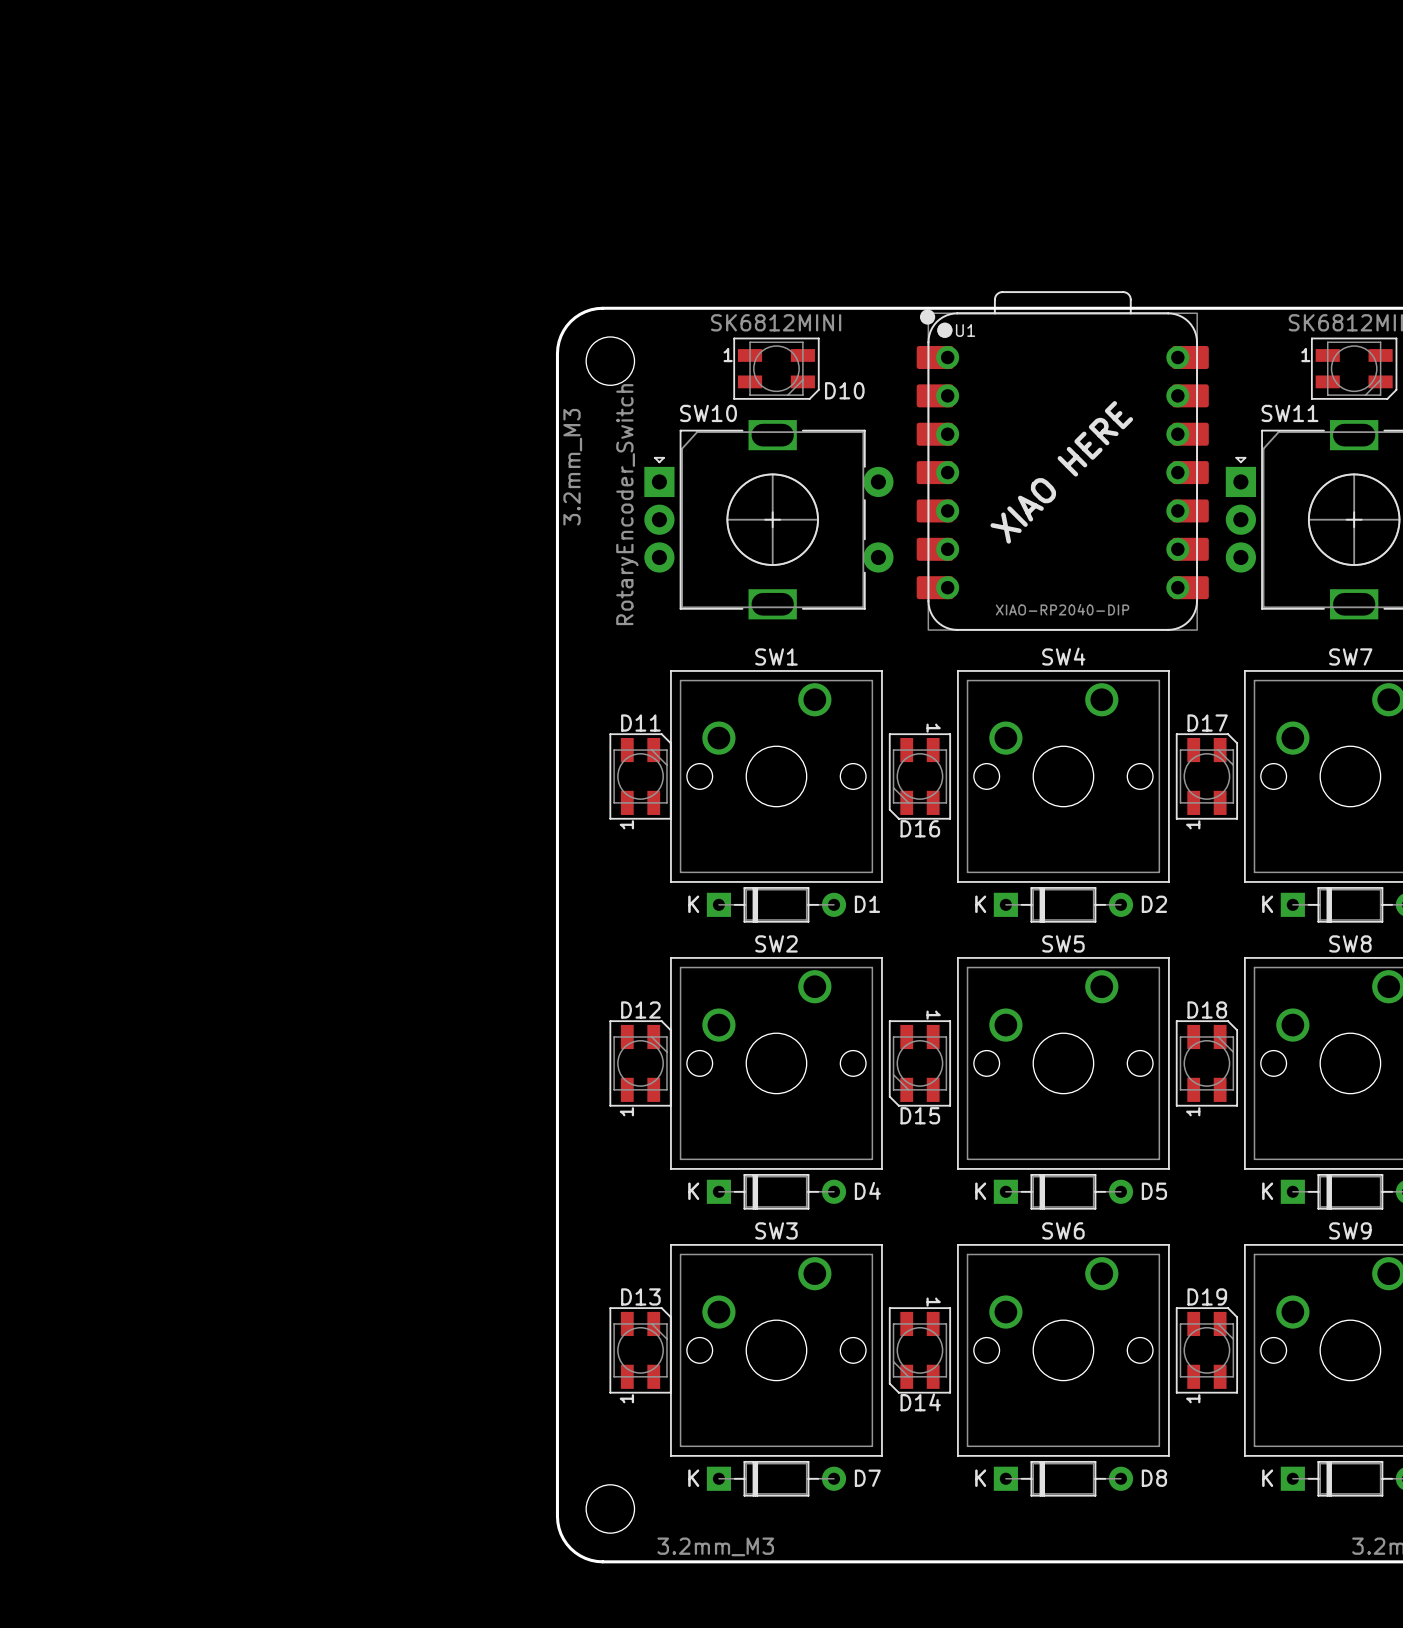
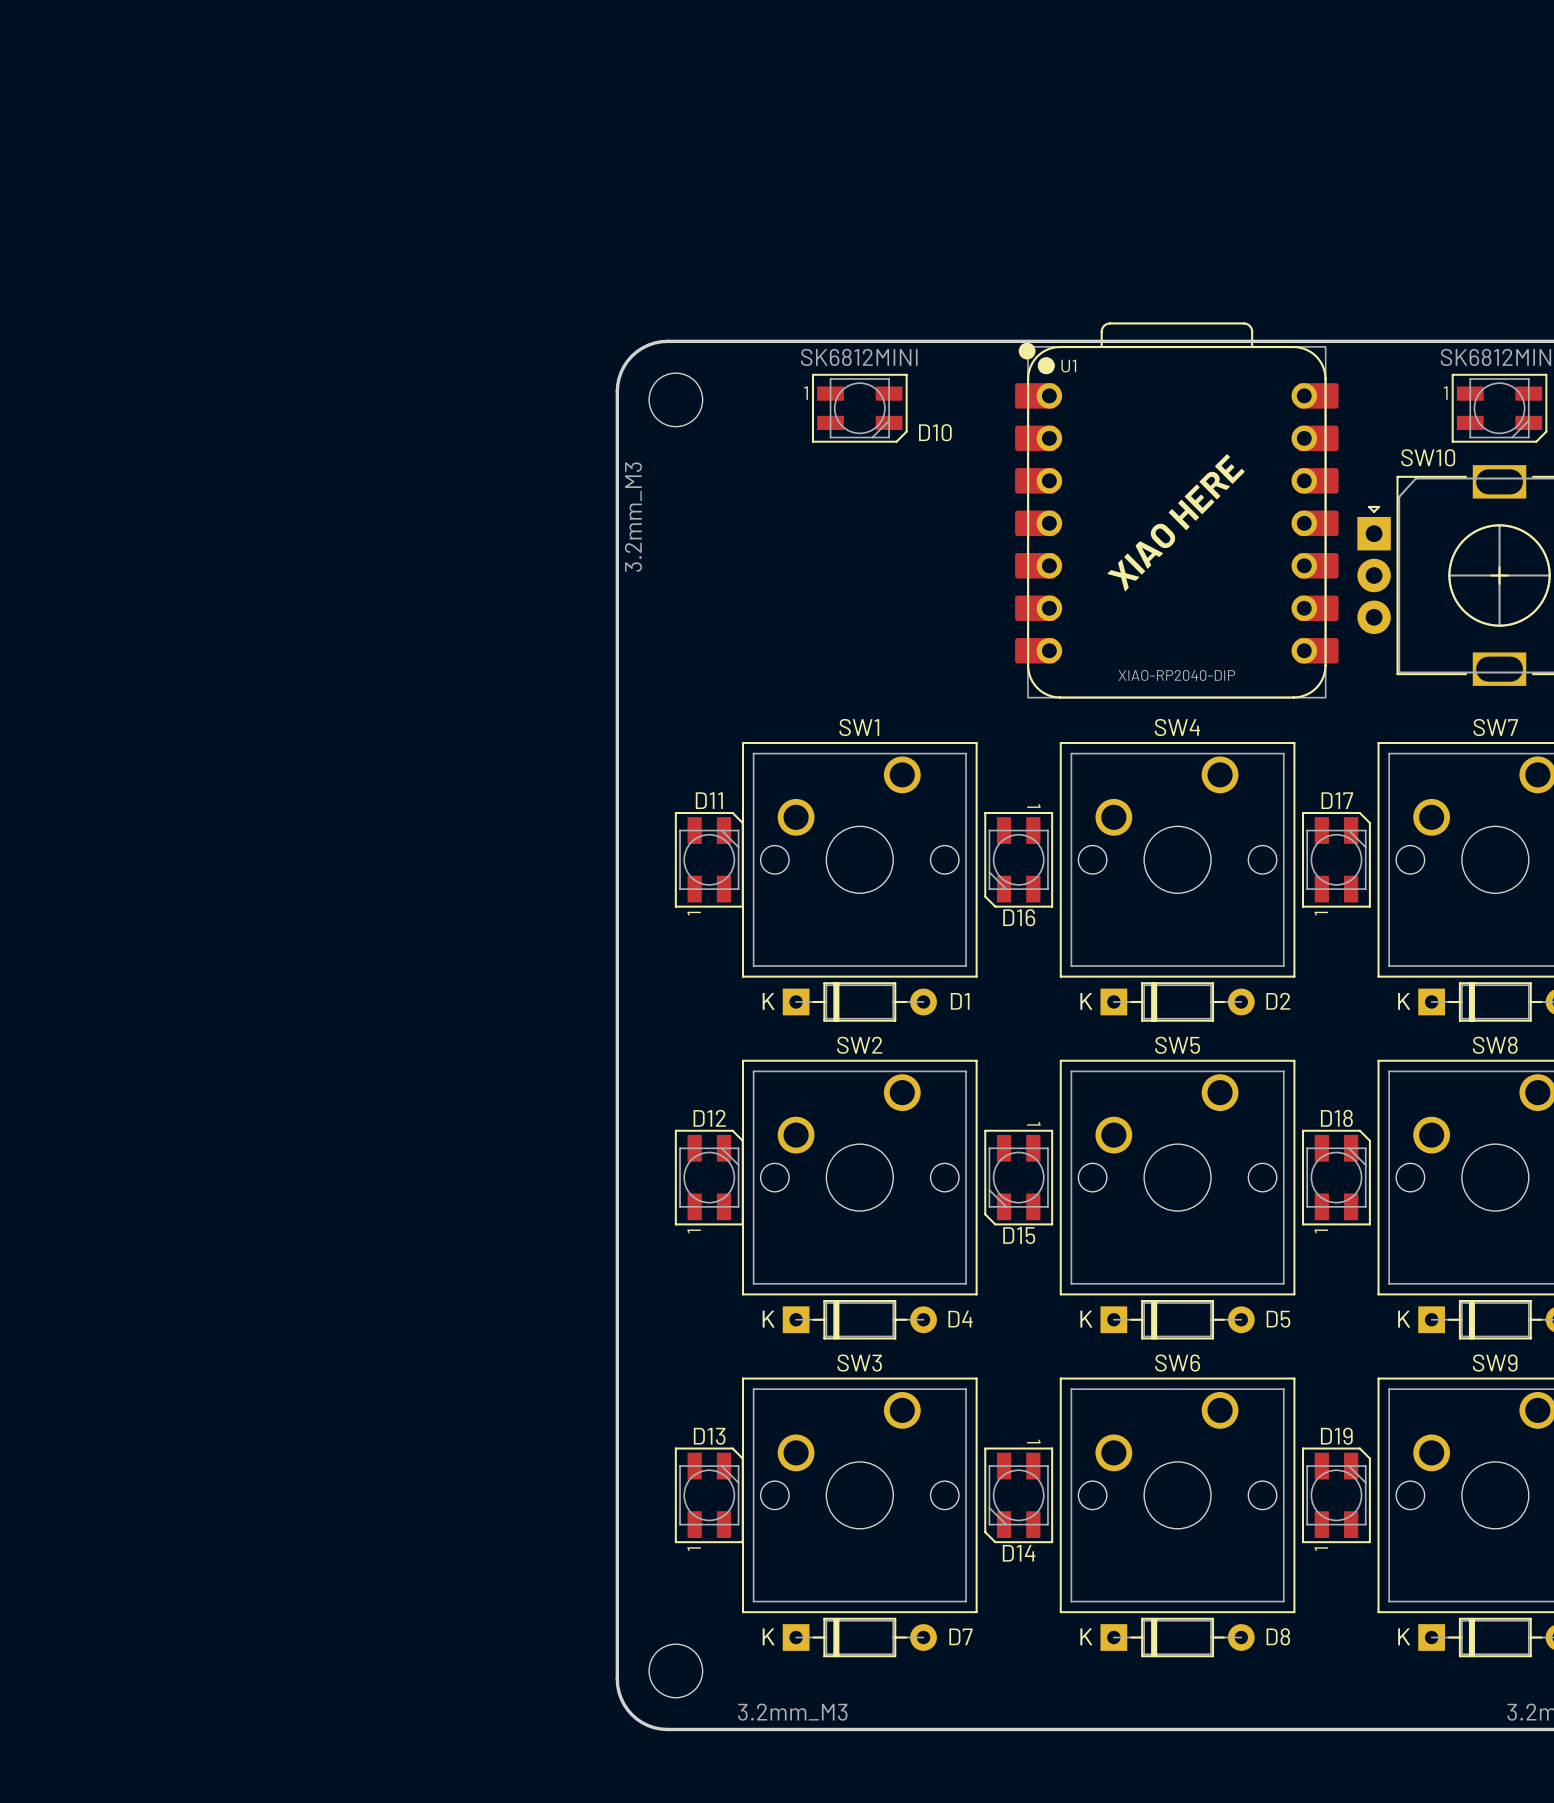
SW11 name: SW11 (1289, 413) -> SW10 (1428, 457)
SW10: RotaryEncoder_Switch (768, 519) -> none

